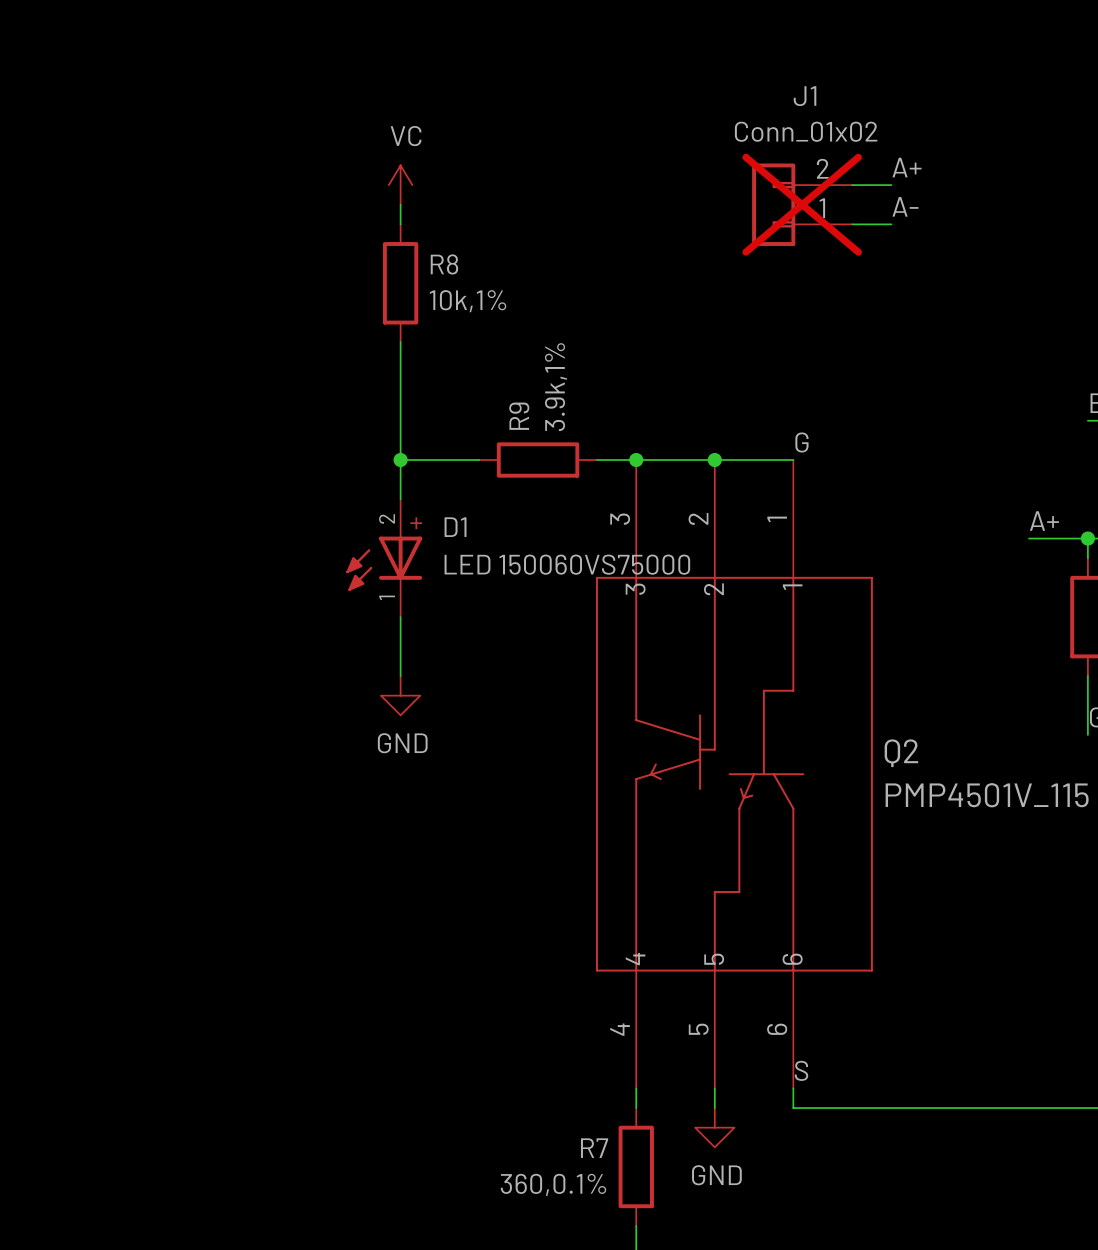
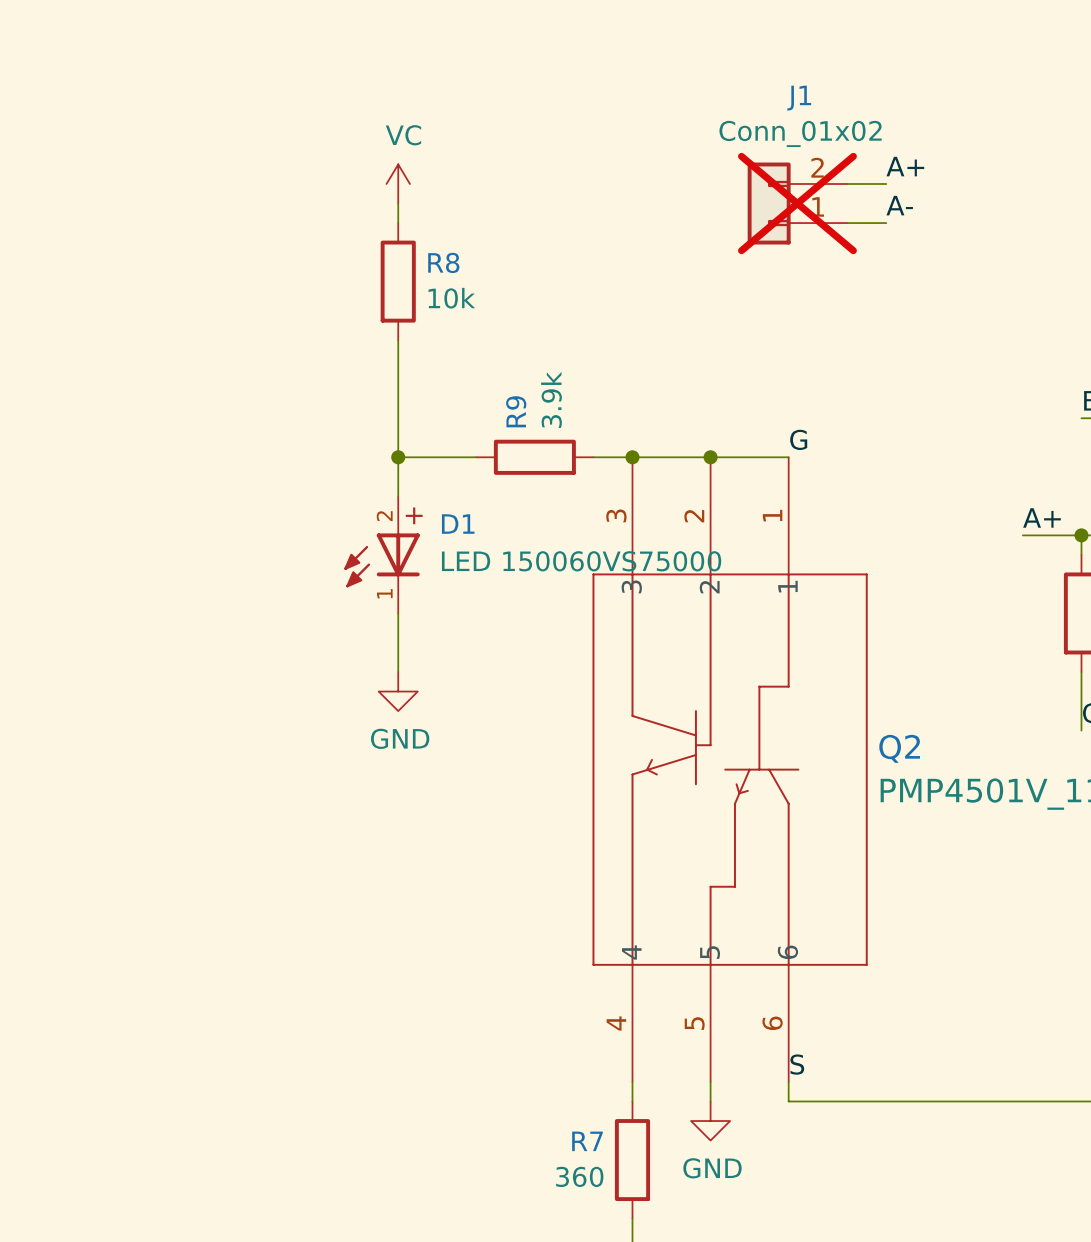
R8 value: 10k,1% (467, 301) -> 10k (451, 298)
R9 value: 3.9k,1% (555, 387) -> 3.9k (551, 399)
R7 value: 360,0.1% (553, 1184) -> 360 (579, 1176)

